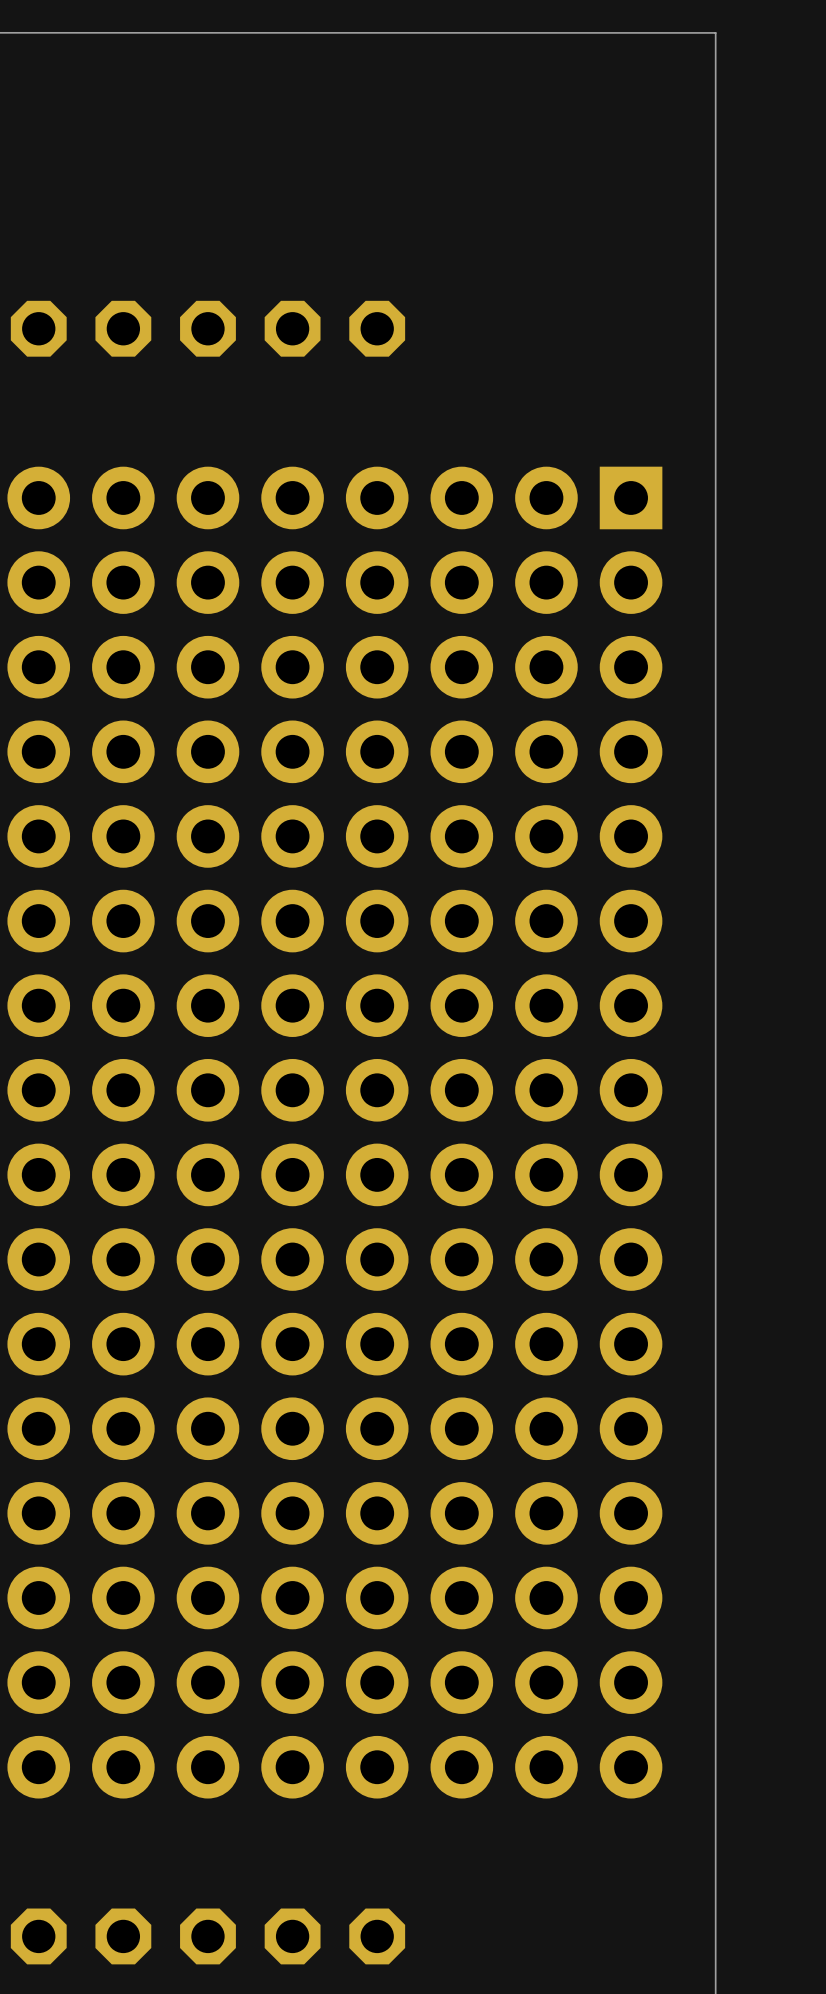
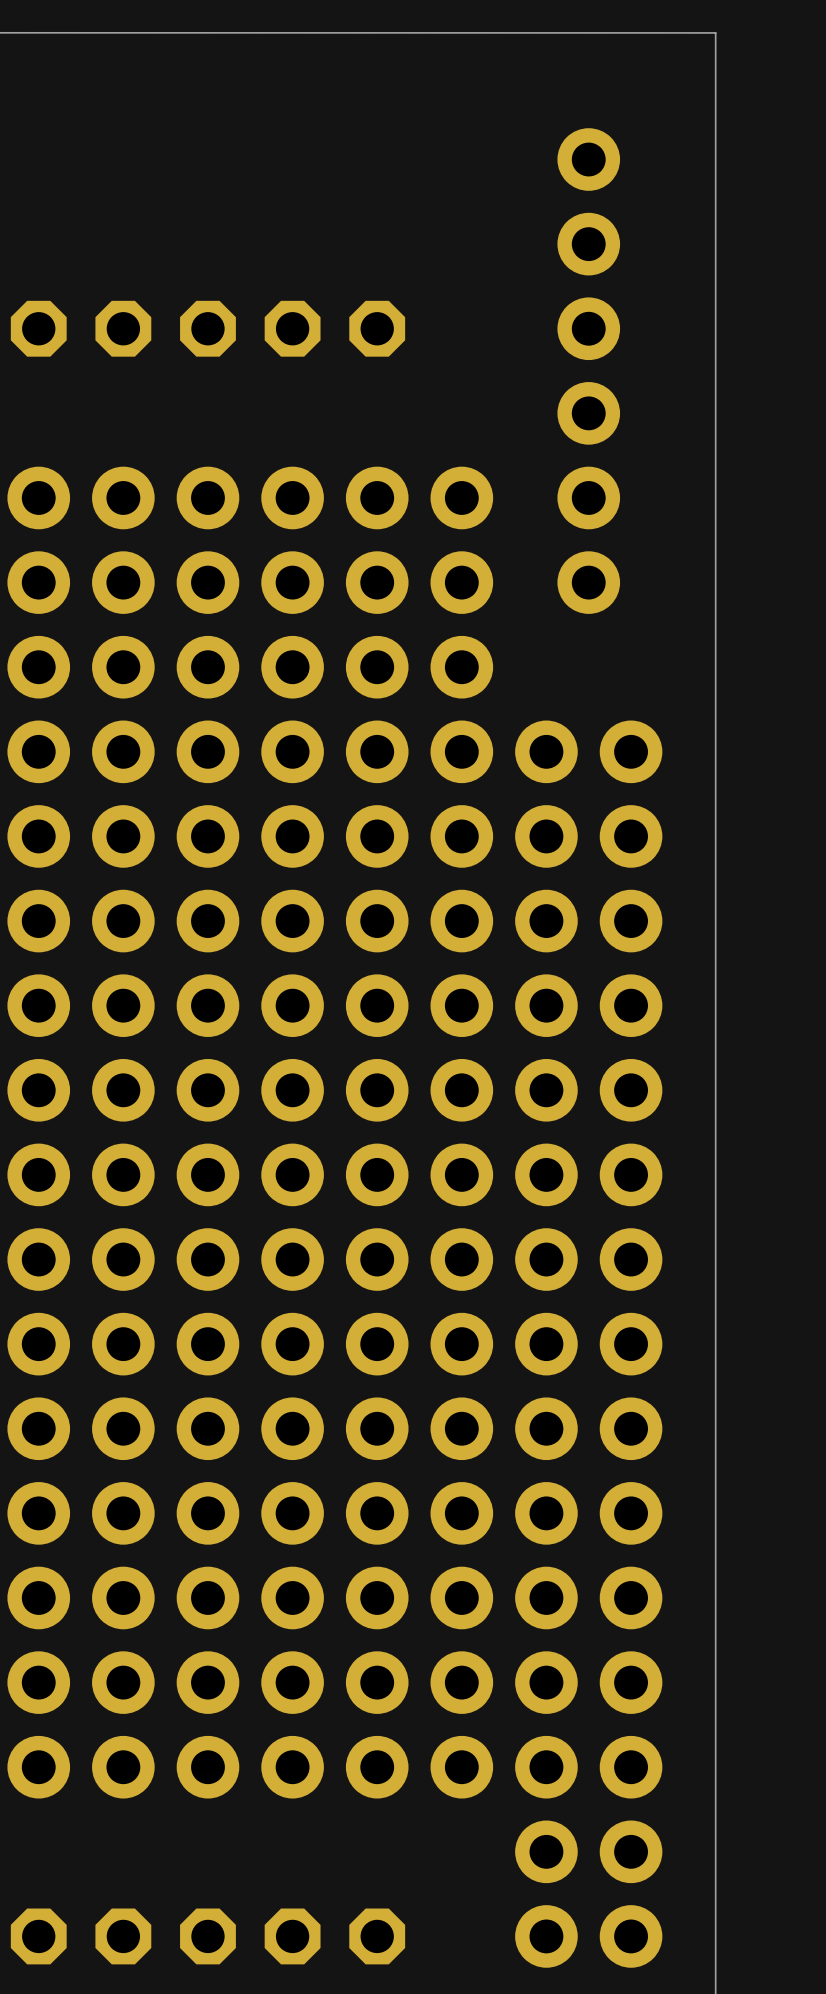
part: none -> (588, 371)
part: (334, 497) -> none
part: (546, 1174) -> none
part: (631, 1174) -> none
part: none -> (546, 1344)
part: none -> (631, 1344)

